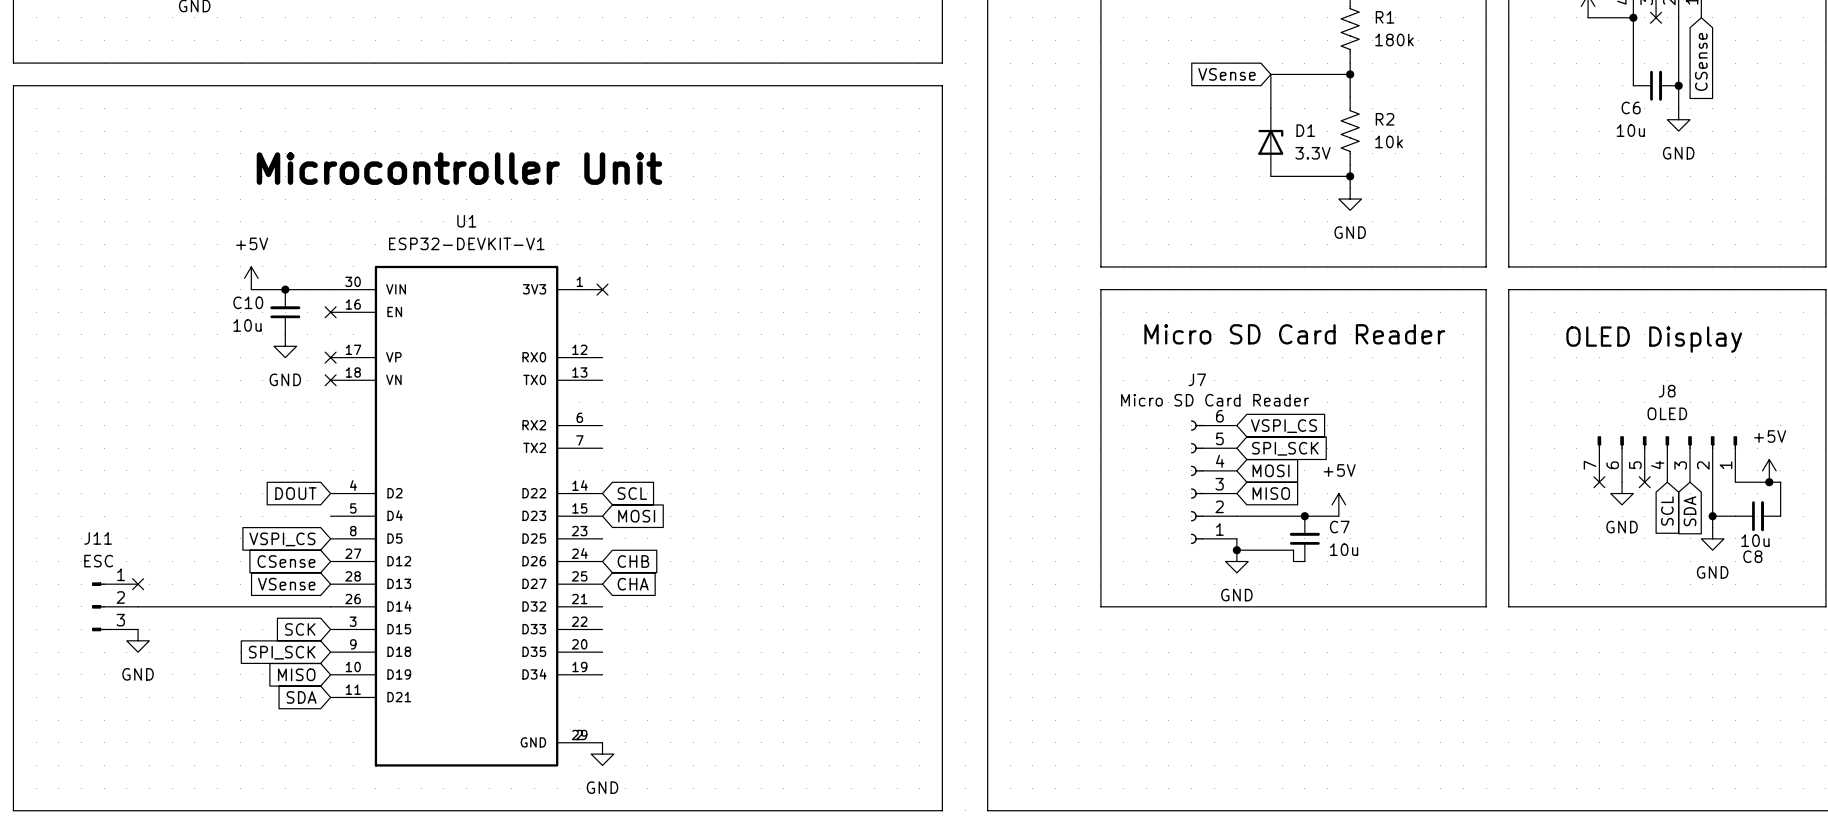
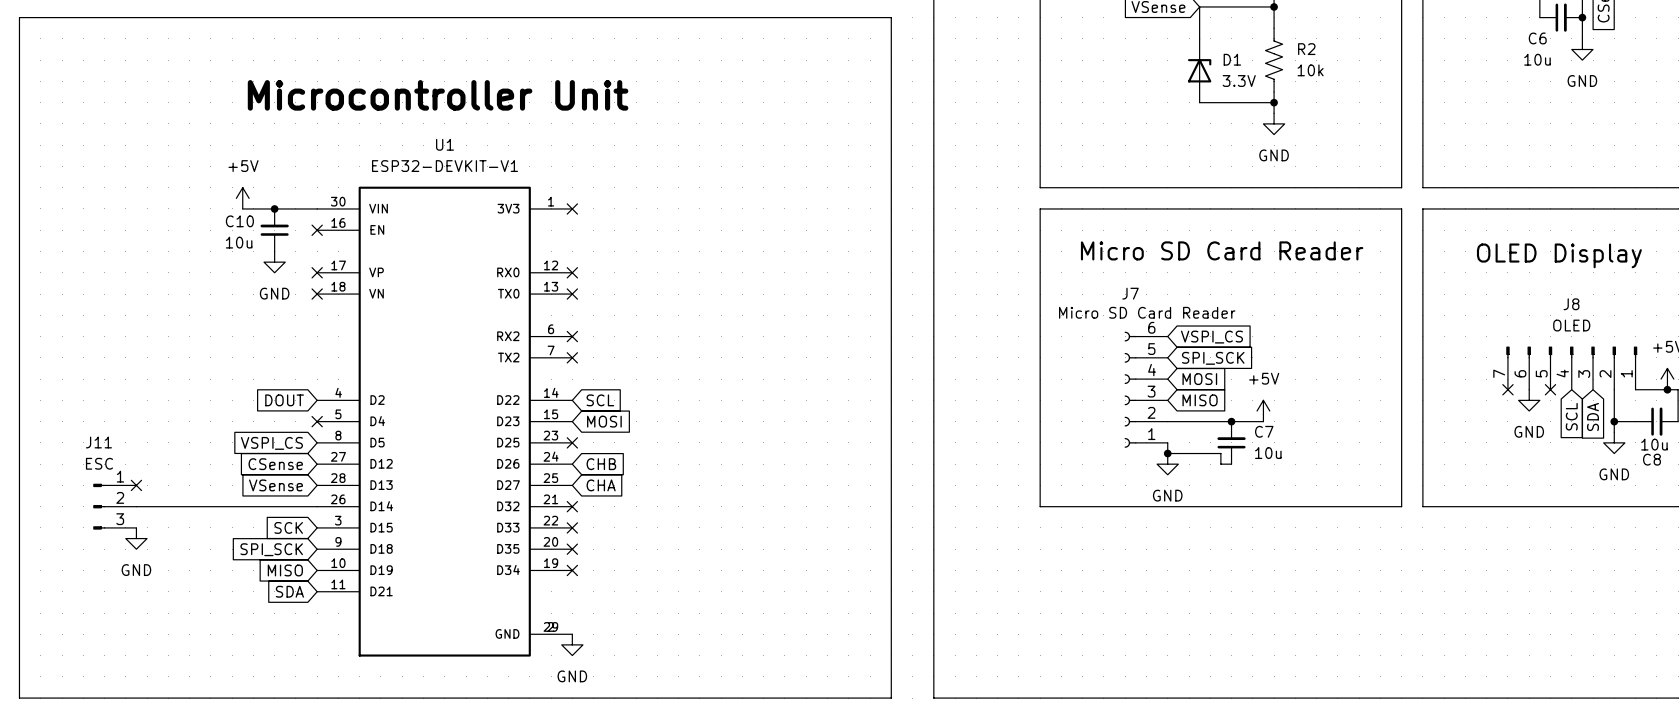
no-connect mark: none -> (572, 272)
no-connect mark: none -> (572, 294)
no-connect mark: none -> (572, 336)
no-connect mark: none -> (572, 357)
no-connect mark: none -> (317, 421)
no-connect mark: none -> (572, 442)
no-connect mark: none -> (572, 506)
no-connect mark: none -> (572, 527)
no-connect mark: none -> (572, 549)
no-connect mark: none -> (572, 570)

